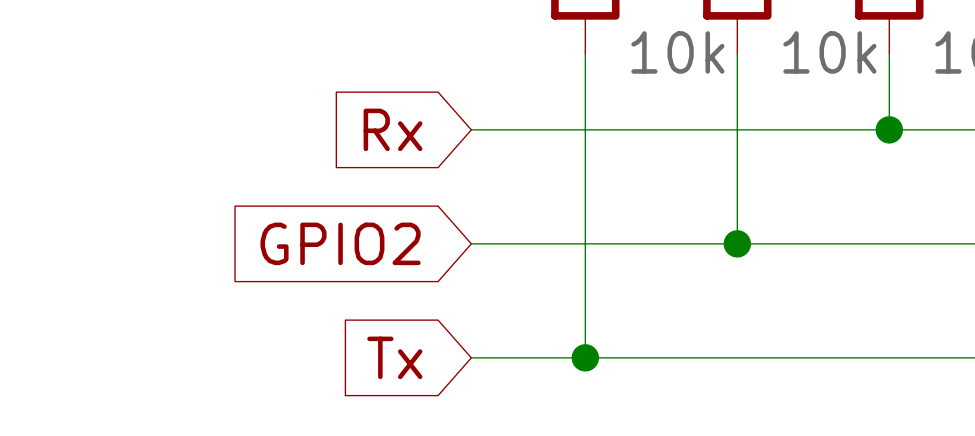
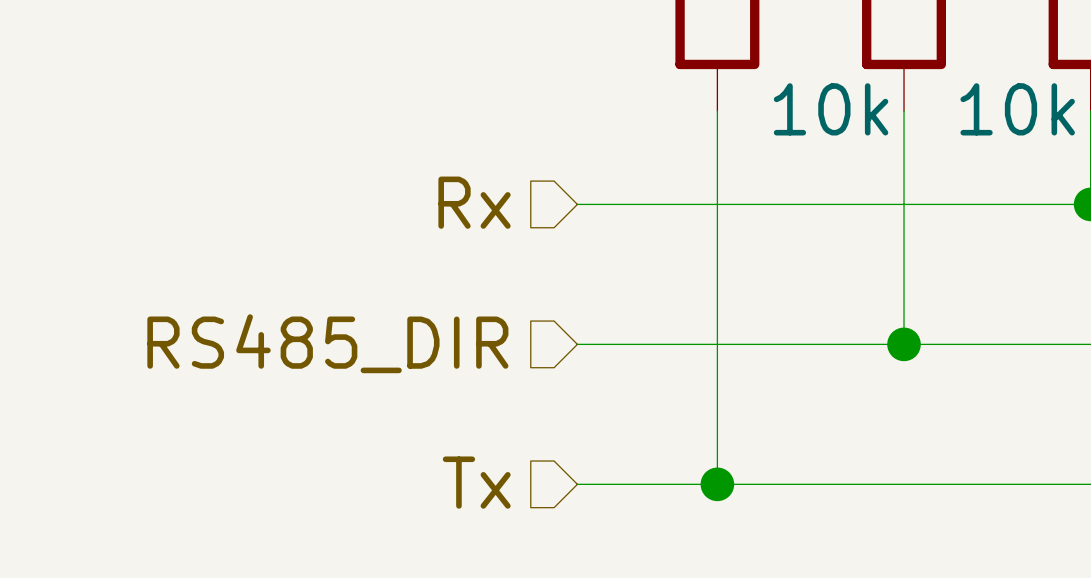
hierarchical label: none -> Rx (474, 202)
global label: Rx (393, 129) -> none
hierarchical label: none -> RS485_DIR (327, 343)
global label: GPIO2 (340, 243) -> none
hierarchical label: none -> Tx (476, 482)
global label: Tx (394, 357) -> none

